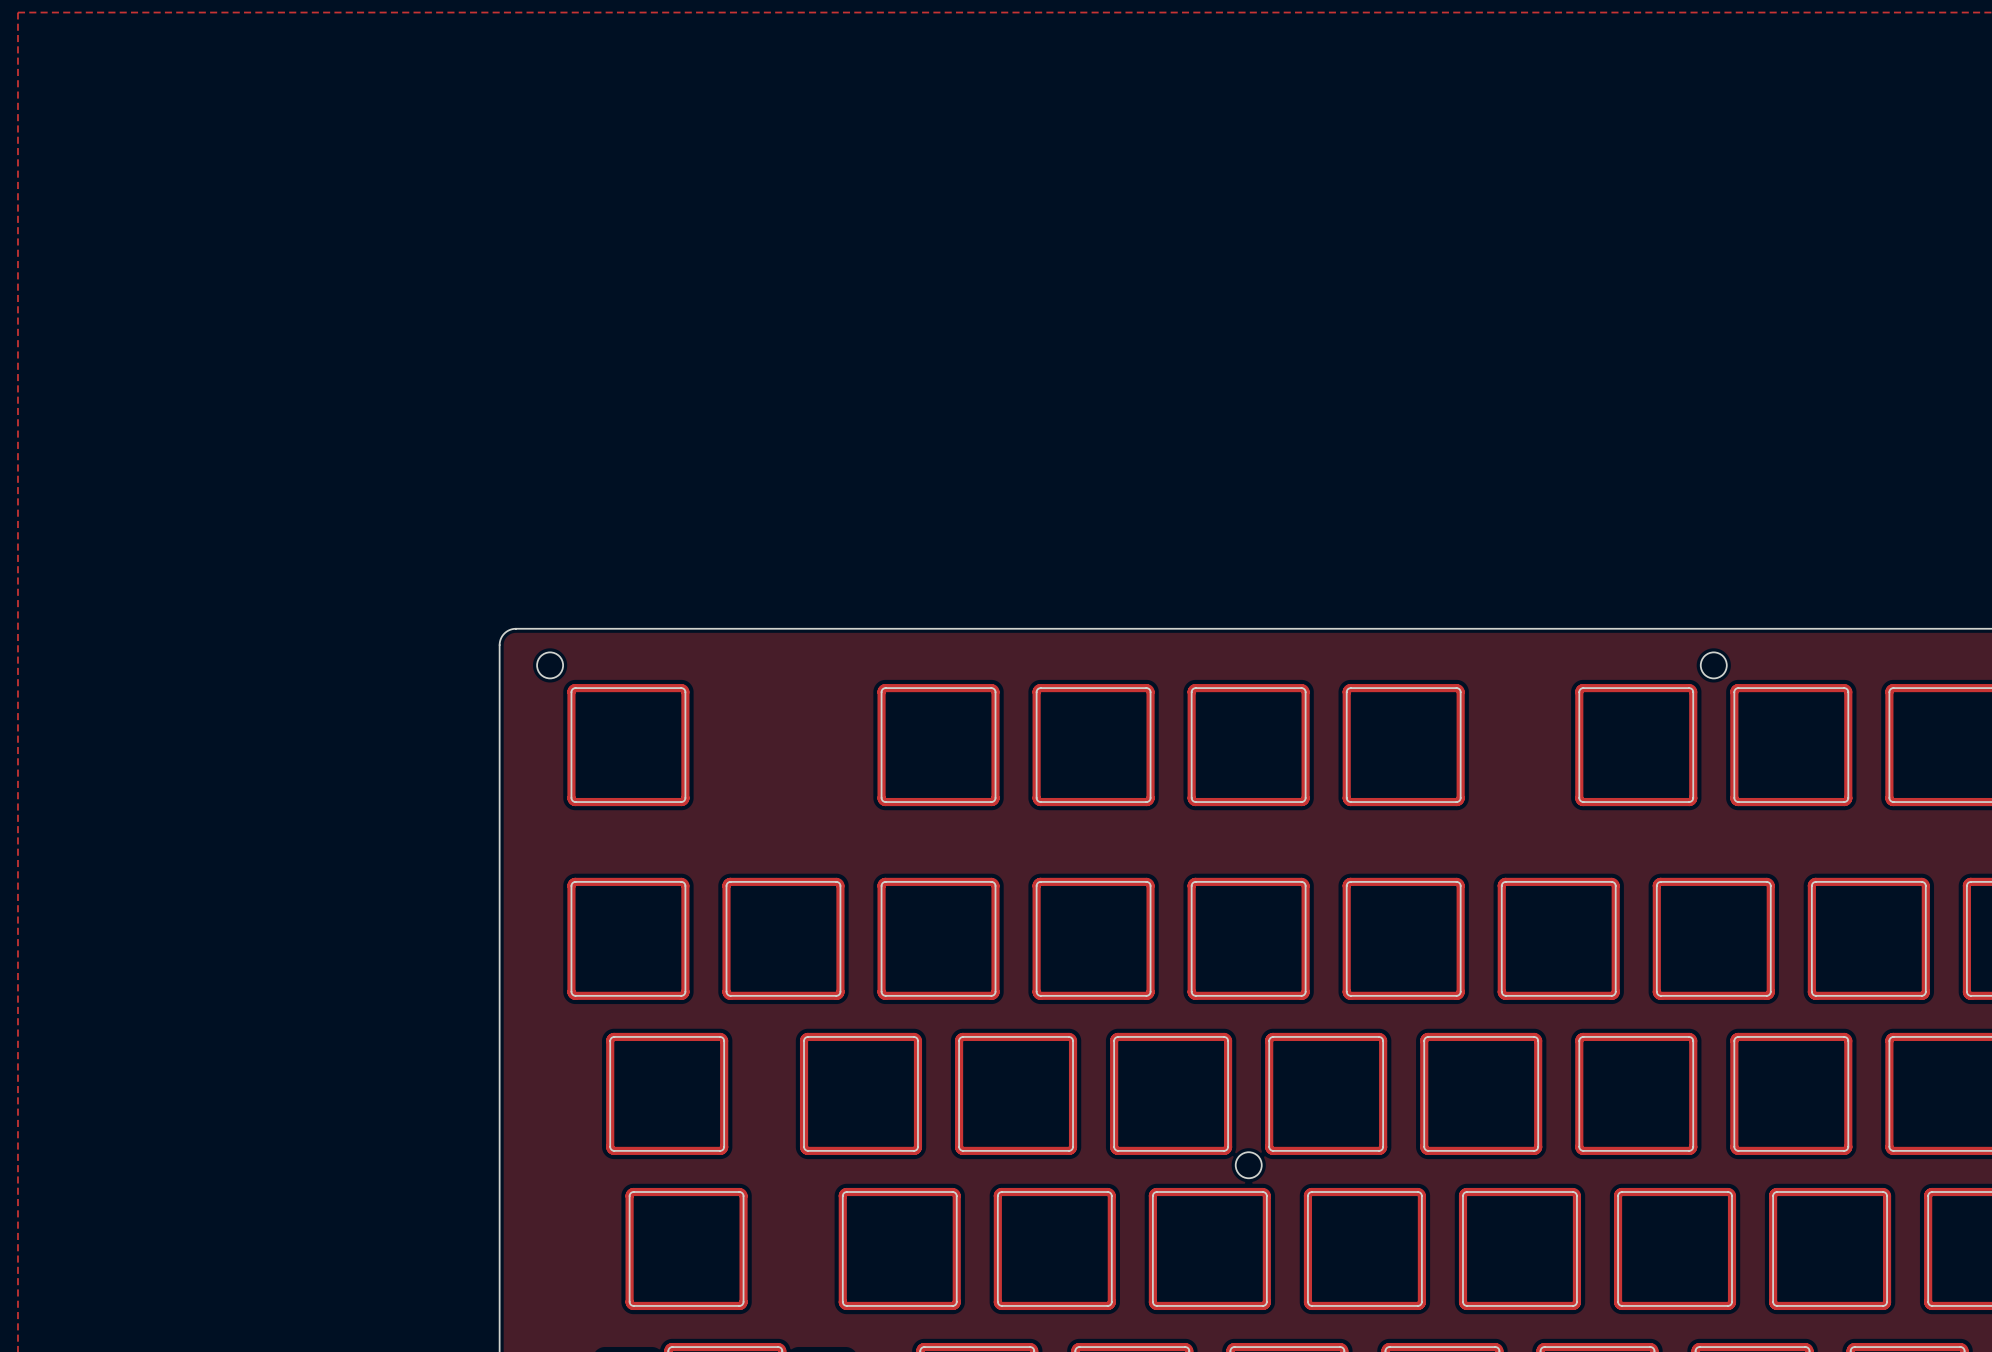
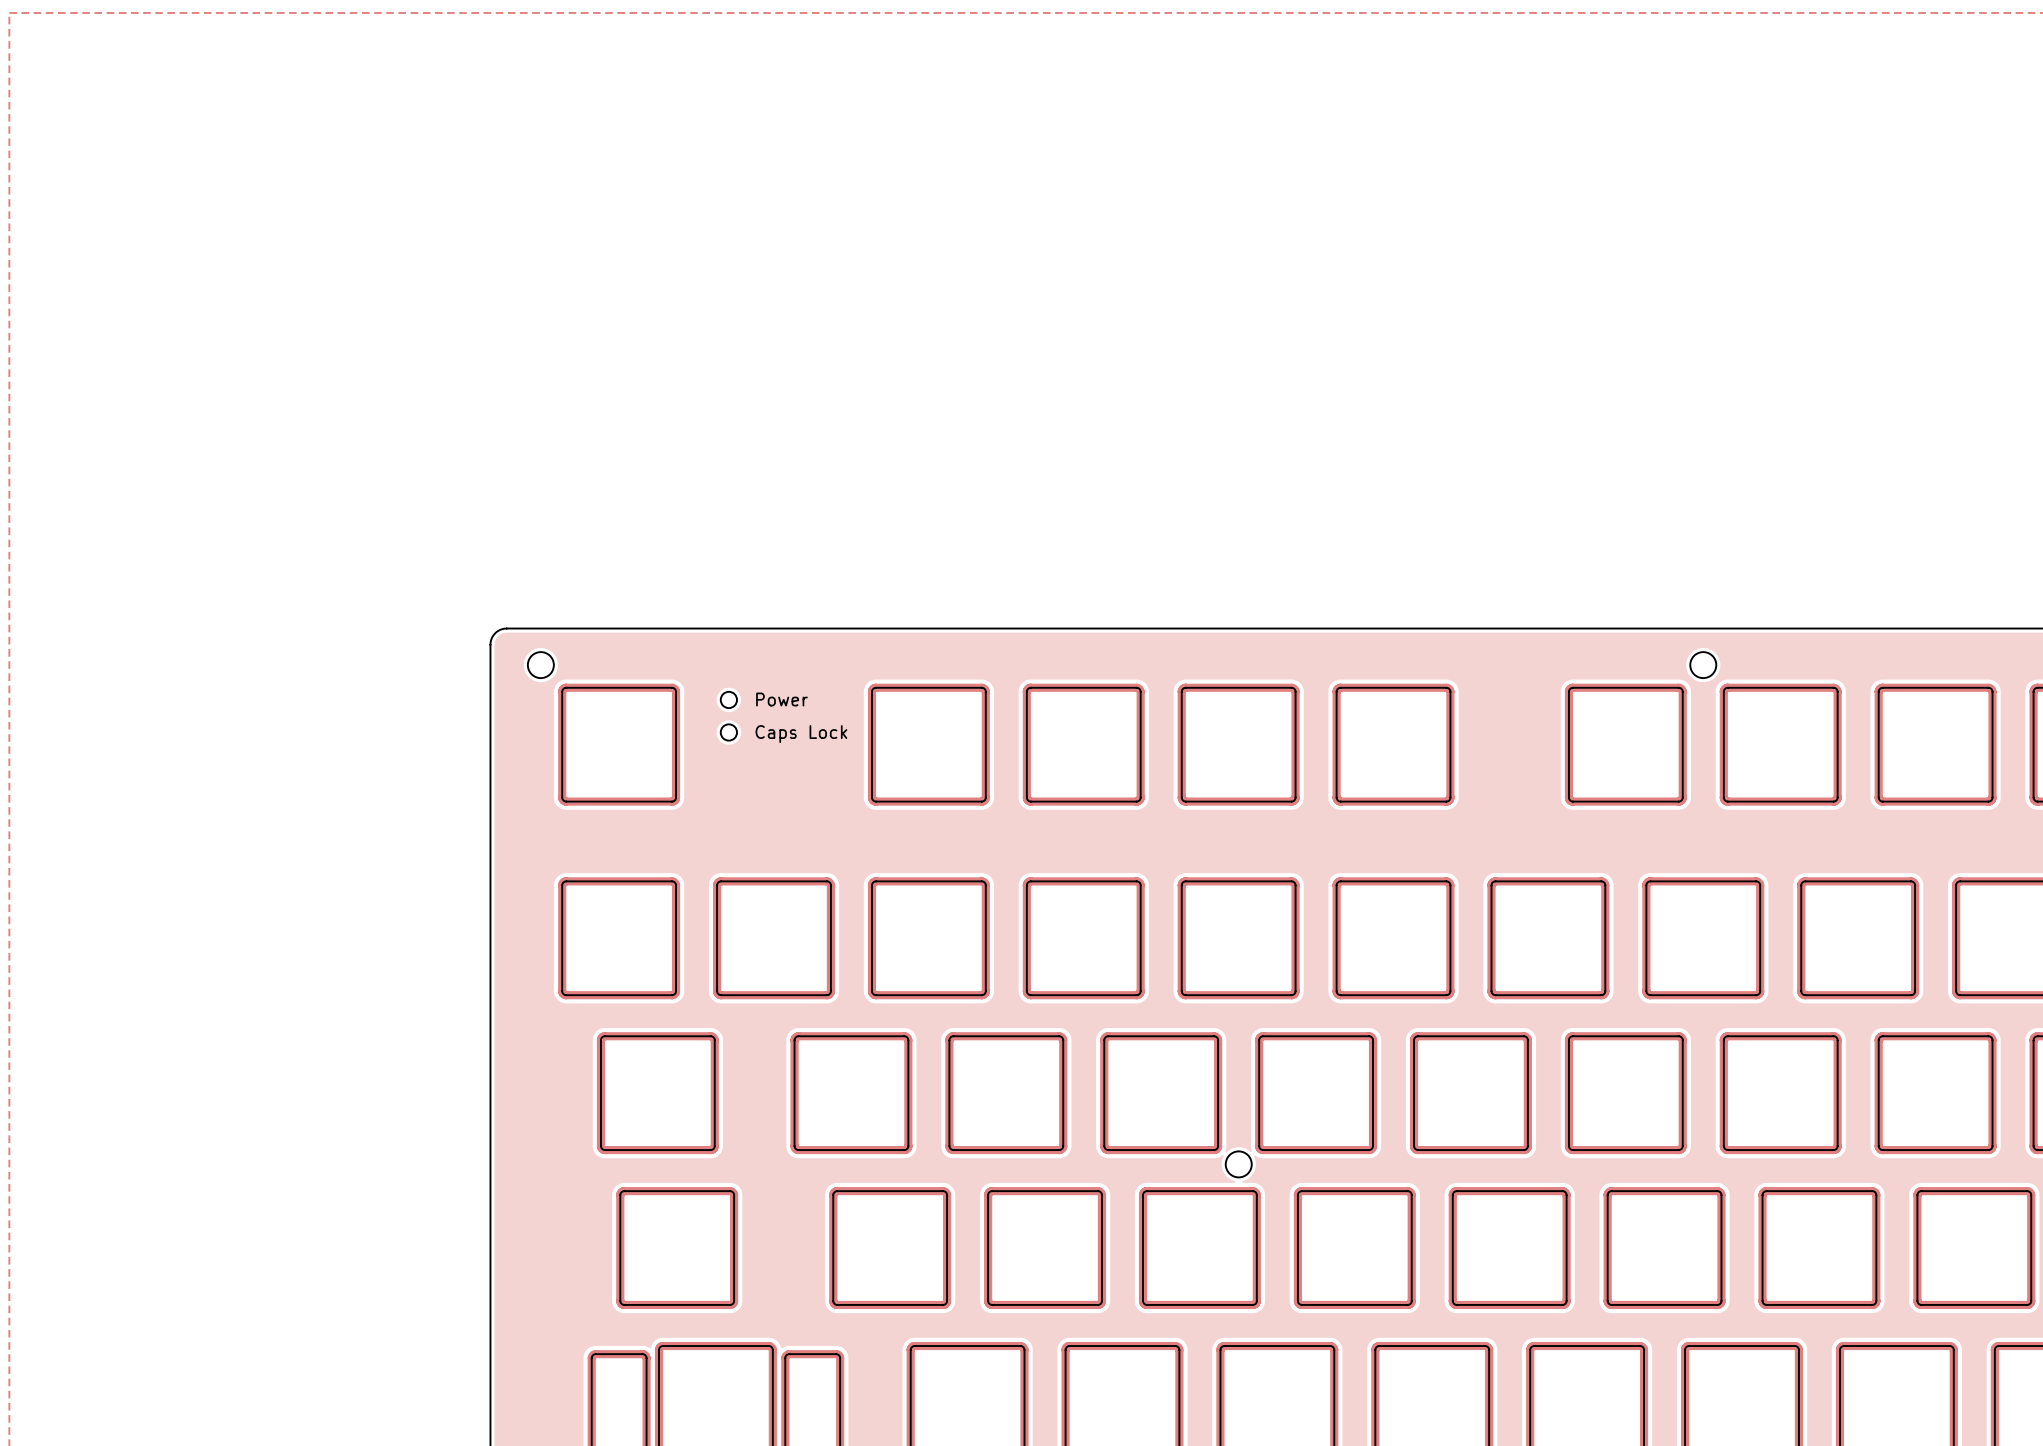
round board edge: none -> [720, 691, 738, 709]
text: none -> Power (781, 699)
round board edge: none -> [720, 723, 738, 742]
text: none -> Caps Lock (801, 734)

